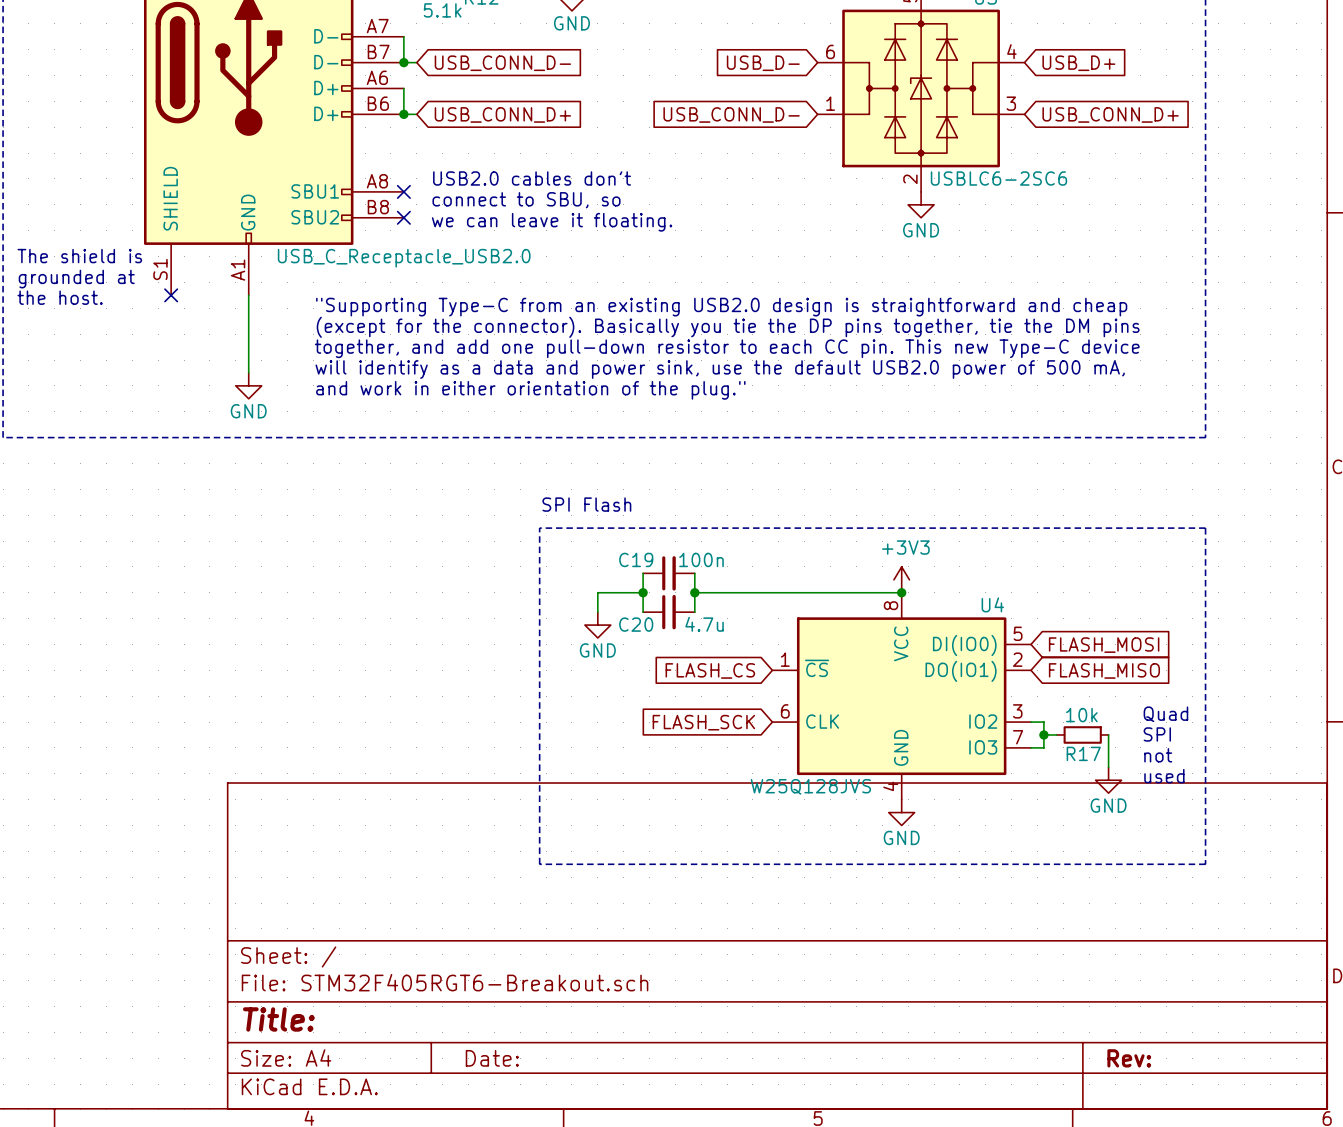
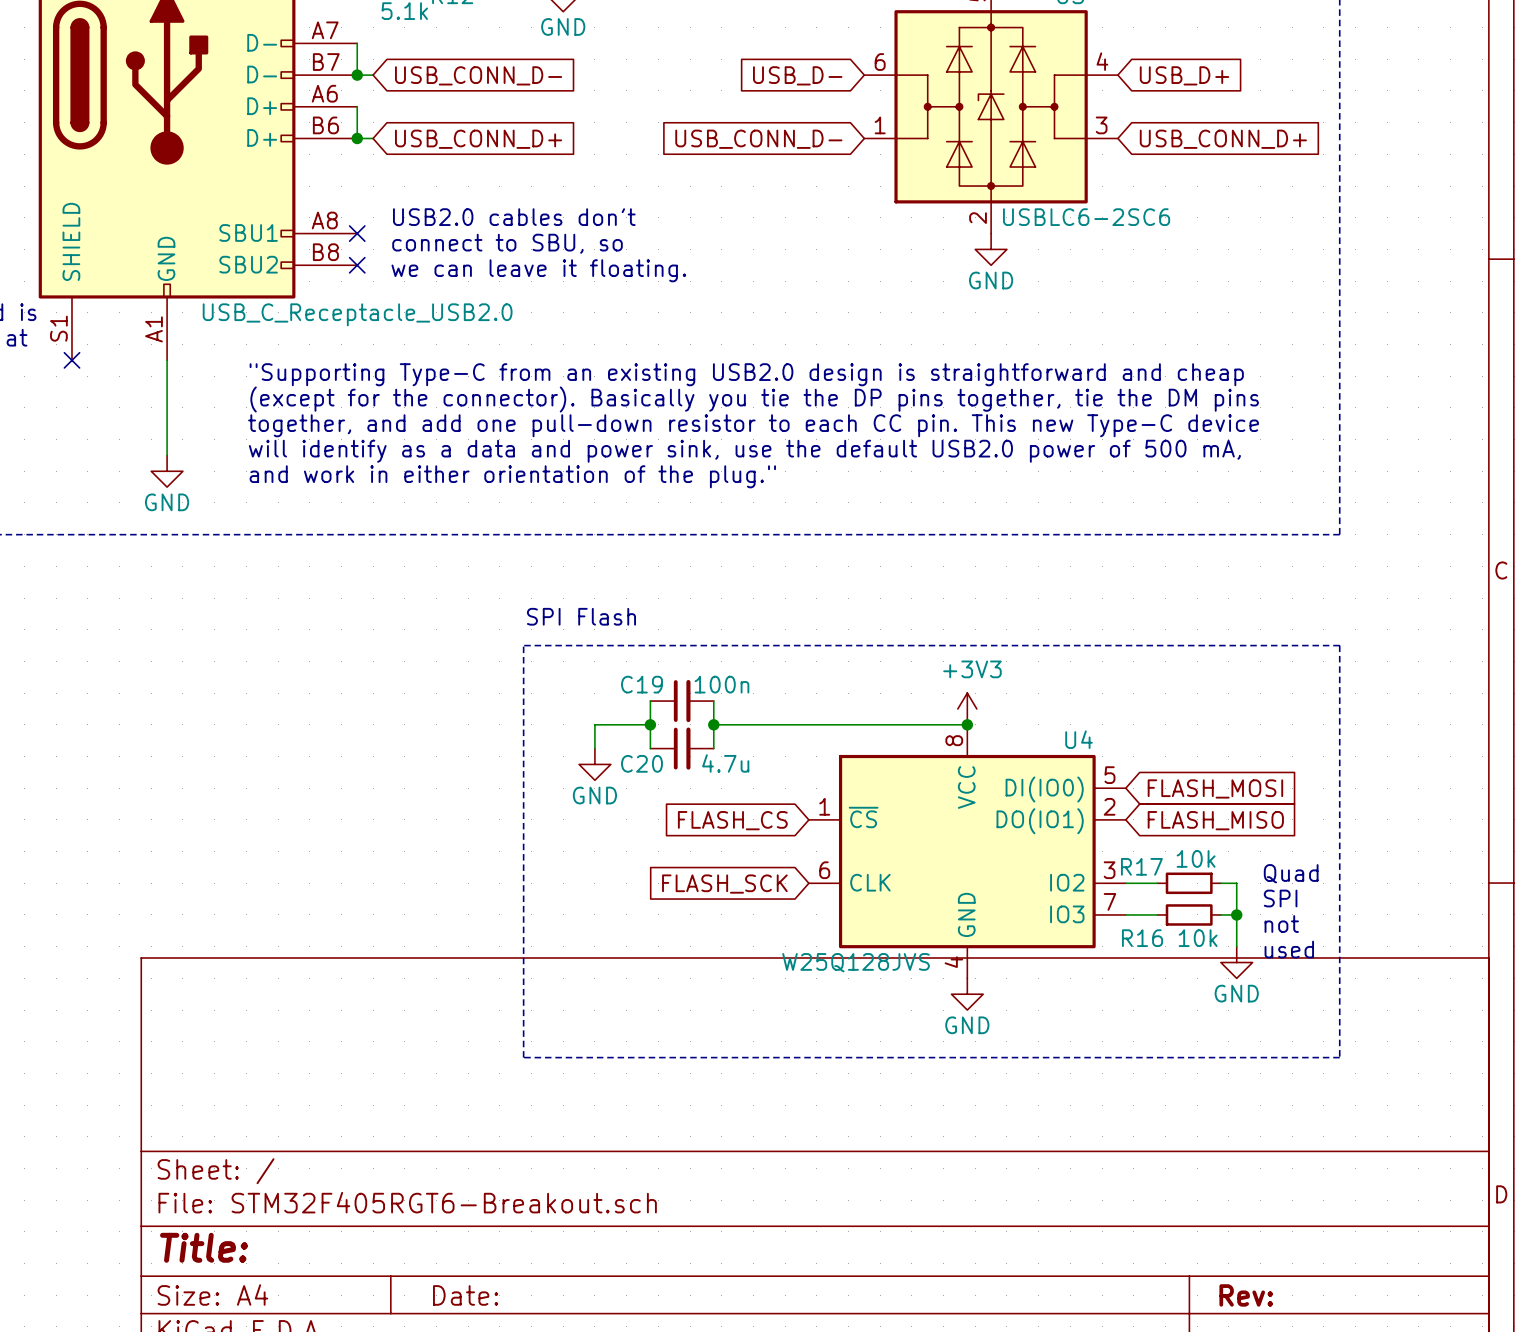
R17 value position: 10k (1081, 715) -> 10k (1198, 938)
wire: (1043, 722) (1043, 747) -> (1141, 883) (1157, 883)
R16: none -> 10k (1189, 883)
wire: none -> (1220, 883) (1236, 883) (1236, 946)
wire: (1043, 734) (1056, 734) -> (1141, 914) (1157, 914)
junction: (1043, 734) -> none
R17 position: (1082, 734) -> (1189, 914)
wire: (1108, 734) (1108, 767) -> none
wire: none -> (1220, 914) (1236, 914)
junction: none -> (1236, 914)
R17 name position: R17 (1083, 753) -> R17 (1141, 866)
power symbol position: GND (1108, 780) -> GND (1236, 962)

